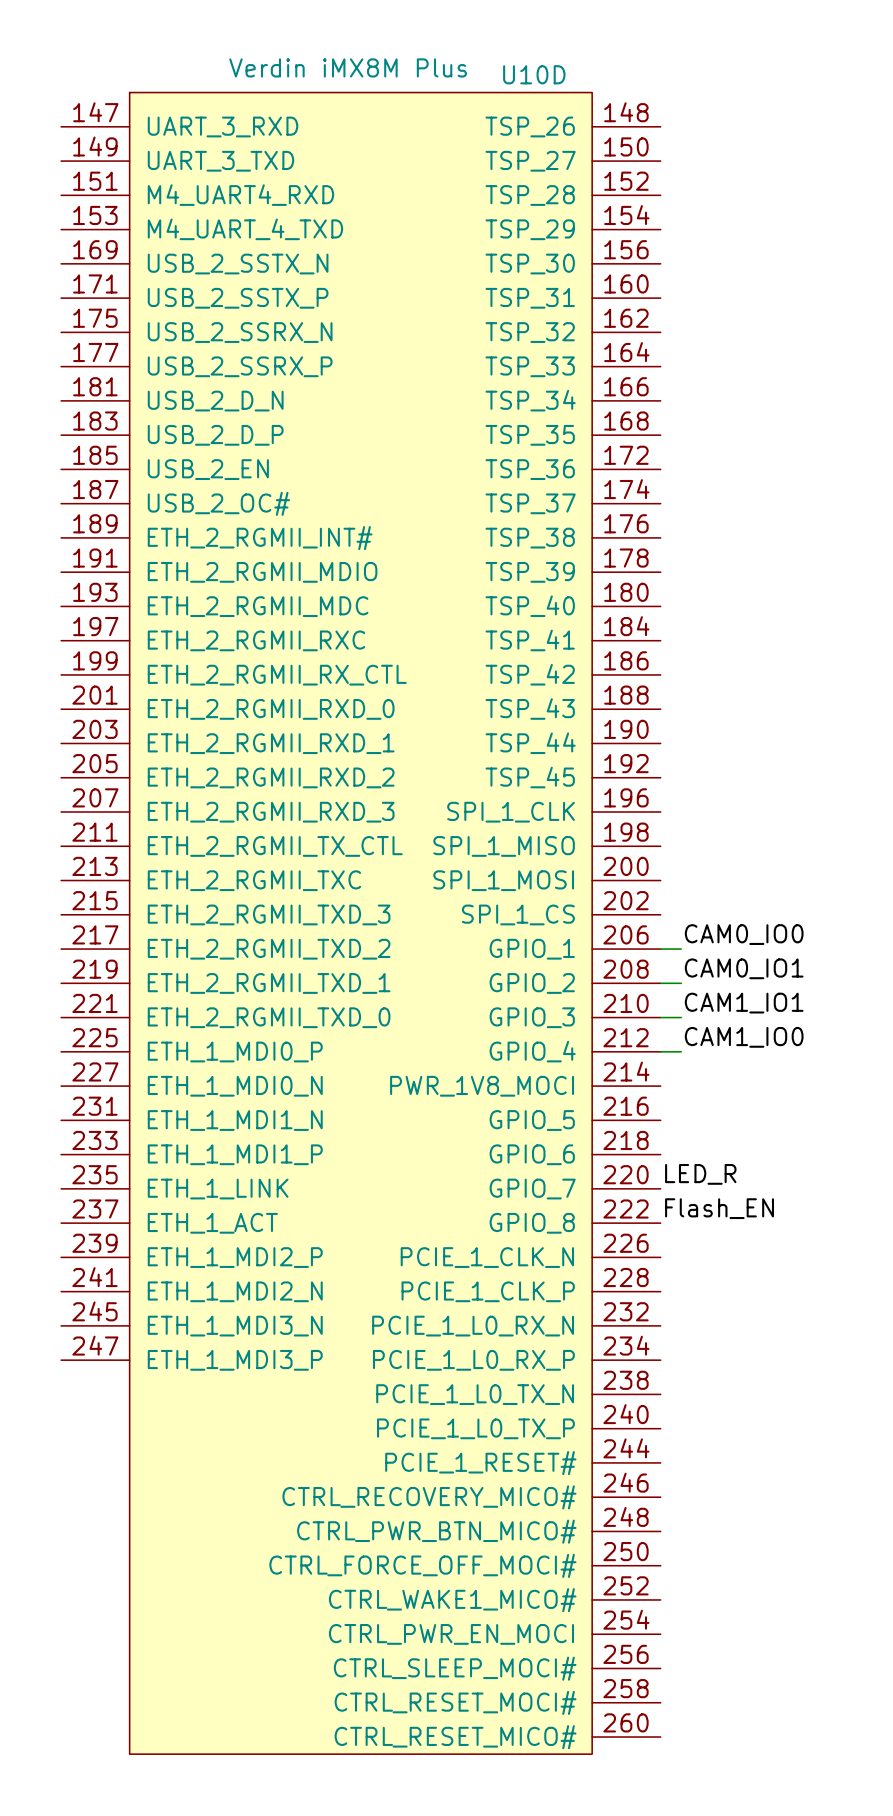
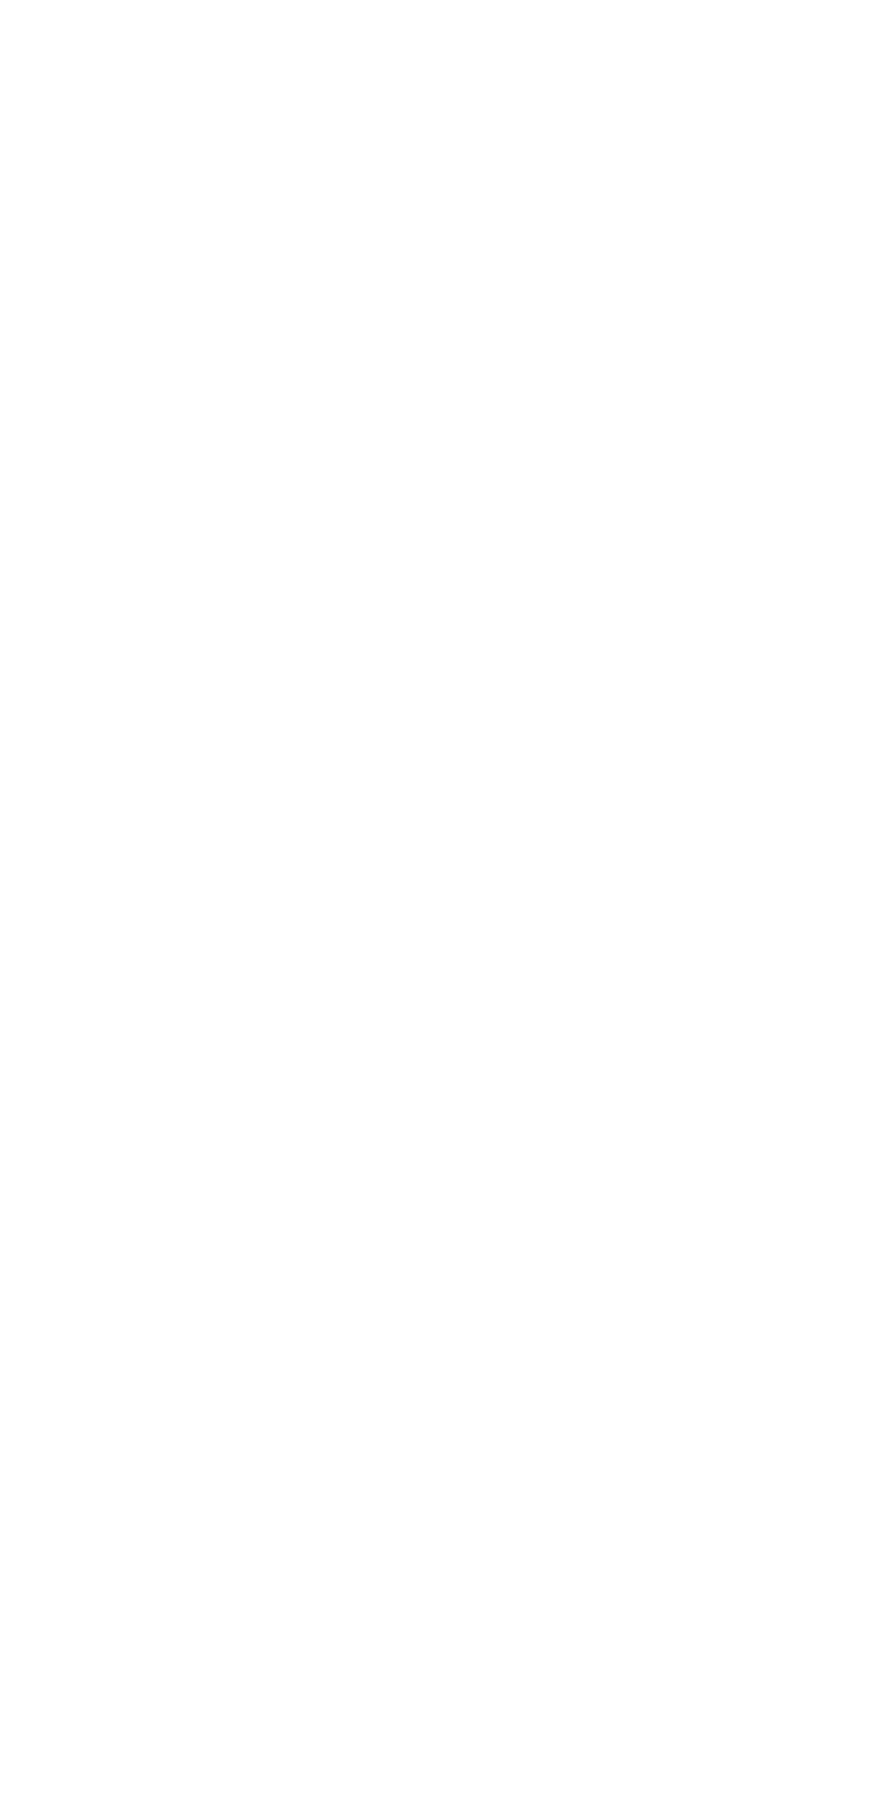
U10D: Verdin iMX8M Plus (360, 923) -> none
label: CAM0_IO0 (744, 934) -> none
wire: (660, 949) (681, 949) -> none
label: CAM0_IO1 (744, 968) -> none
wire: (660, 983) (681, 983) -> none
label: CAM1_IO1 (744, 1003) -> none
wire: (660, 1017) (681, 1017) -> none
label: CAM1_IO0 (744, 1037) -> none
wire: (660, 1051) (681, 1051) -> none
label: LED_R (700, 1174) -> none
label: Flash_EN (719, 1208) -> none

